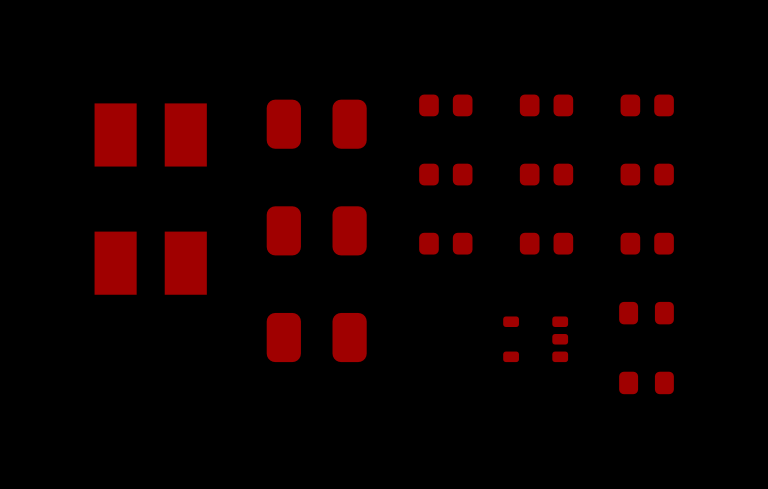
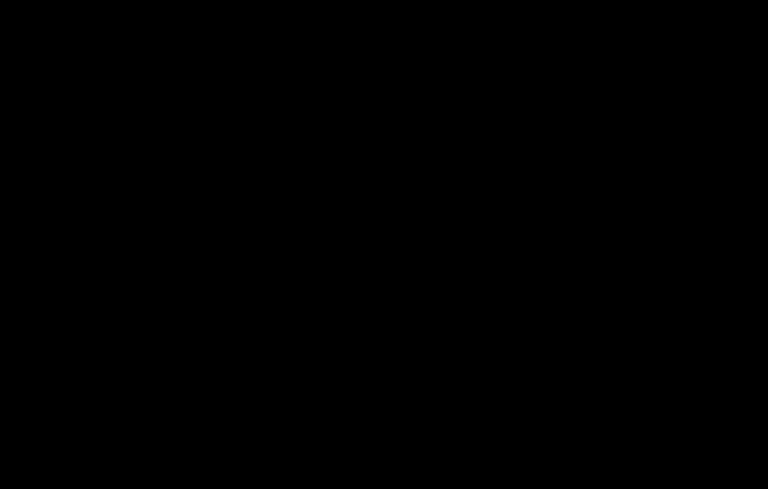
part: (445, 105) -> none
part: (546, 105) -> none
part: (647, 105) -> none
part: (316, 124) -> none
part: (150, 134) -> none
part: (445, 174) -> none
part: (546, 174) -> none
part: (647, 174) -> none
part: (316, 230) -> none
part: (445, 243) -> none
part: (546, 243) -> none
part: (647, 243) -> none
part: (150, 263) -> none
part: (646, 313) -> none
part: (316, 337) -> none
part: (535, 339) -> none
part: (646, 382) -> none

